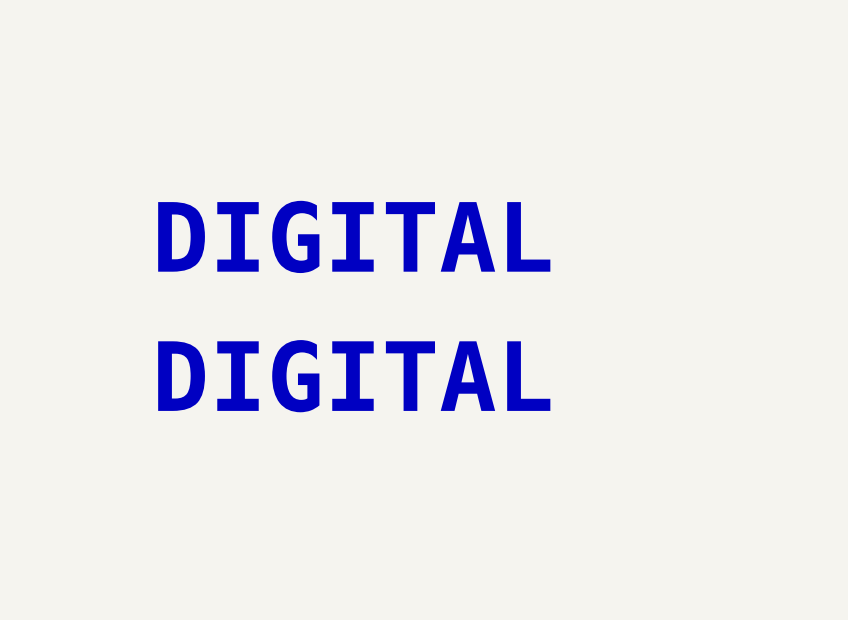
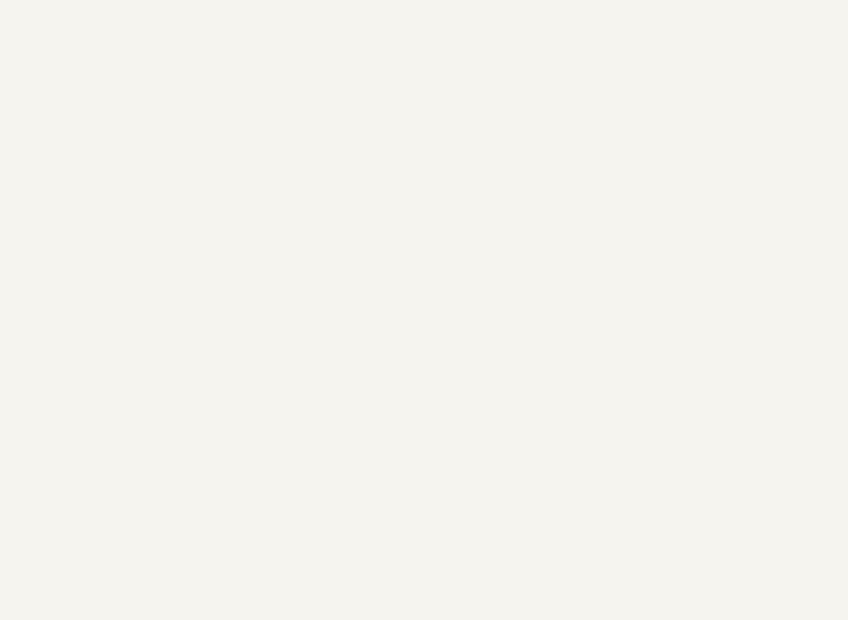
text: DIGITAL (354, 236) -> none
text: DIGITAL (354, 376) -> none

